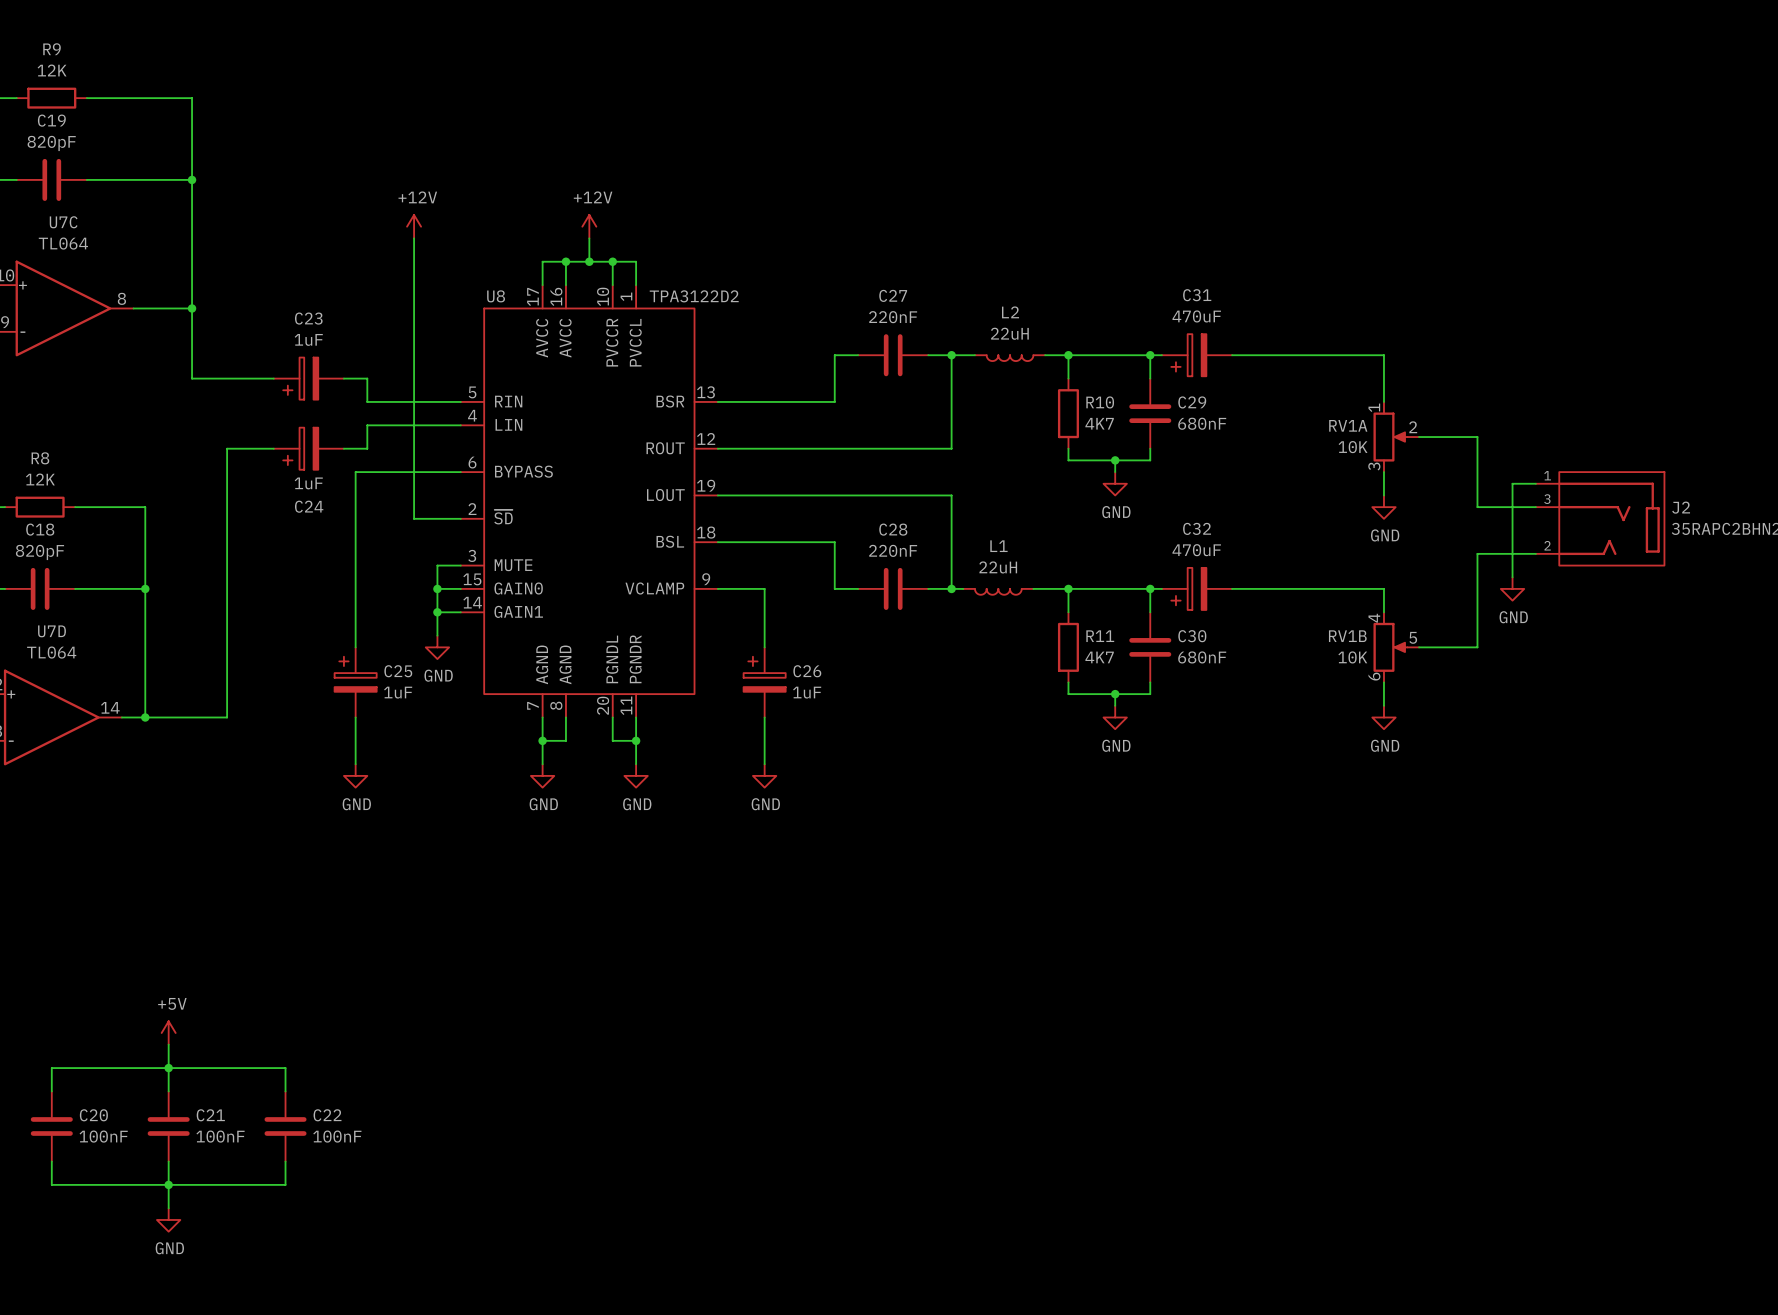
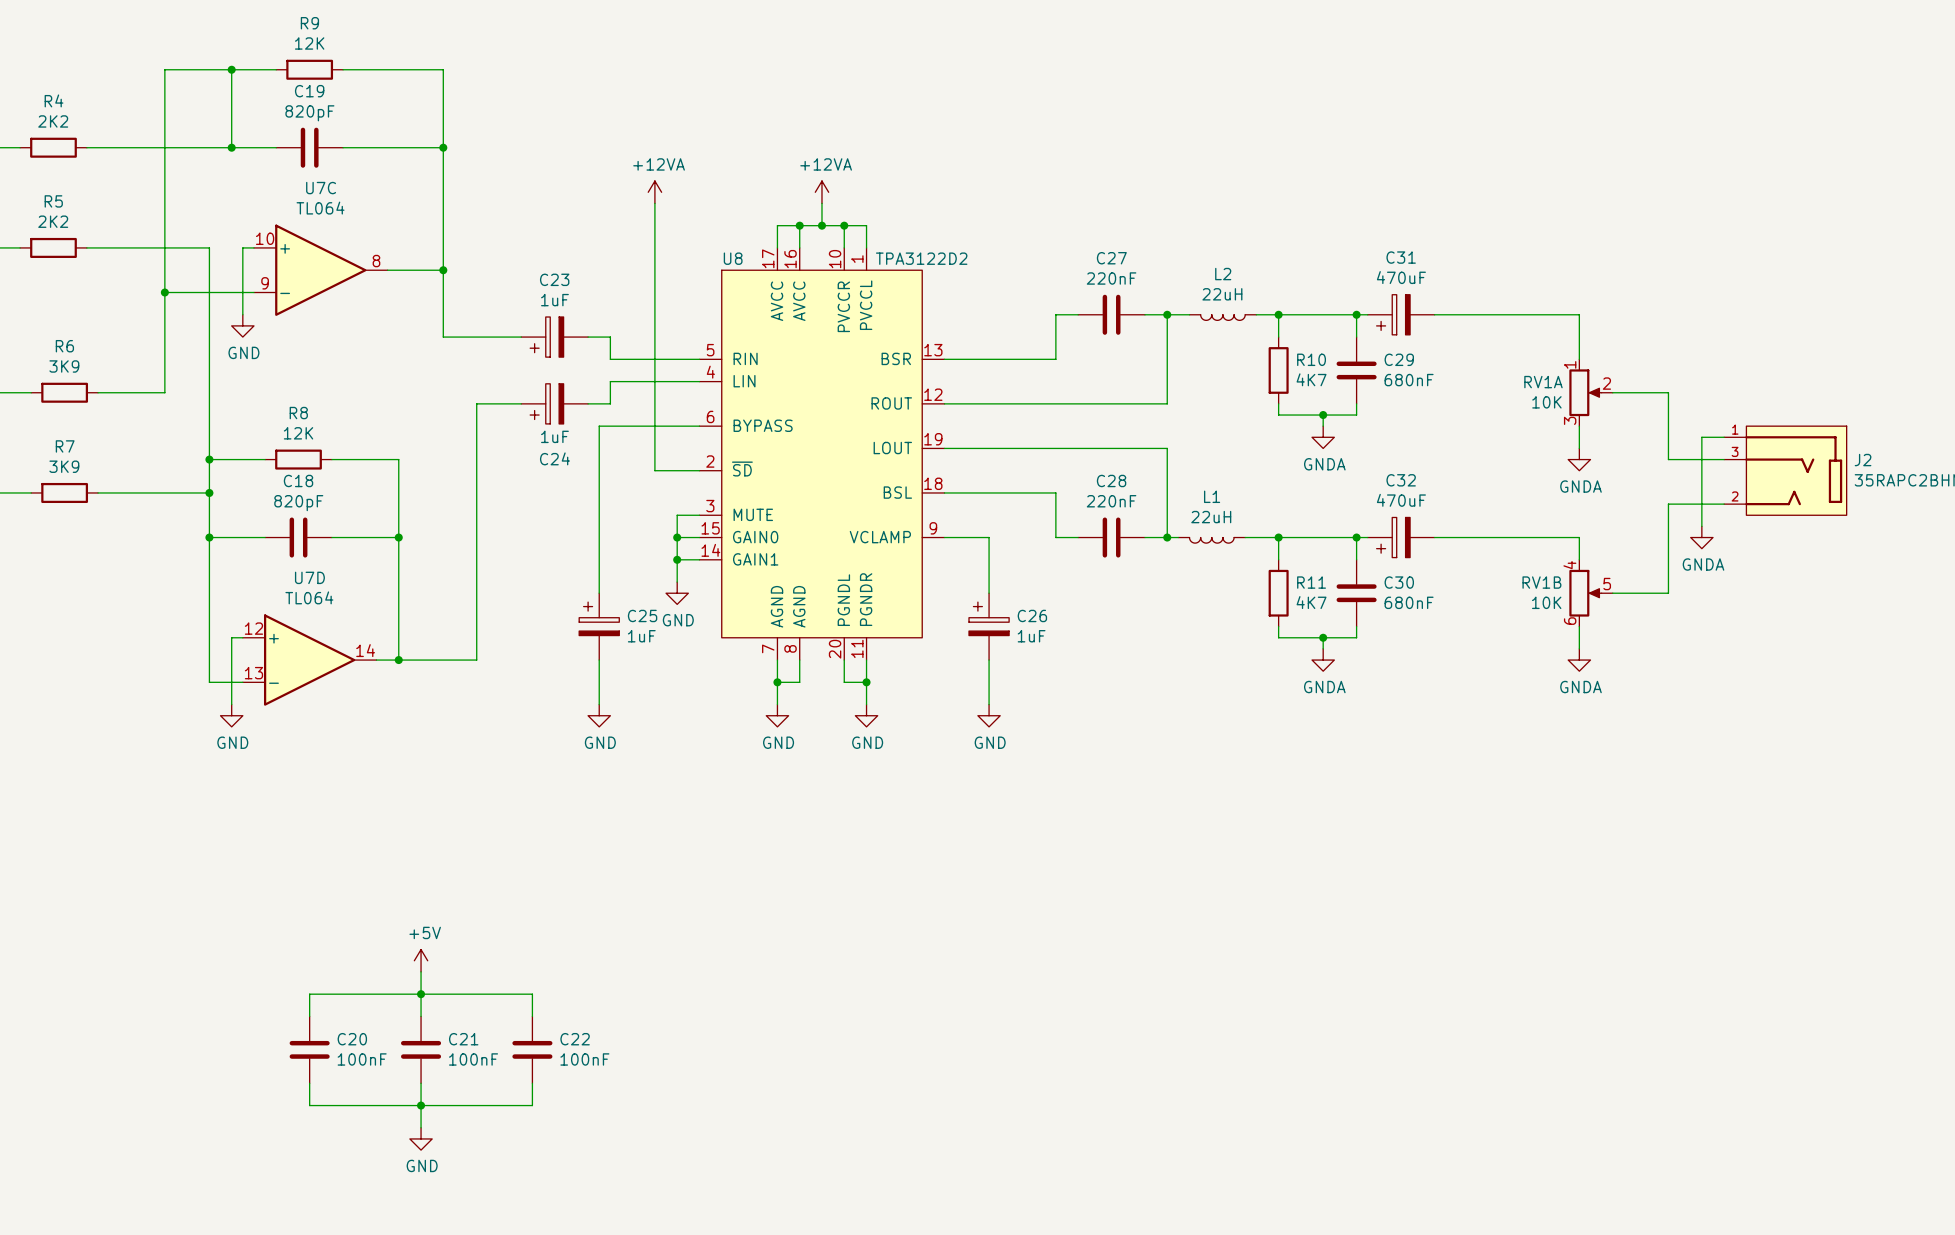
power symbol: +12V (414, 226) -> +12VA (654, 192)
power symbol: +12V (589, 226) -> +12VA (821, 192)
power symbol: GND (1115, 483) -> GNDA (1323, 437)
power symbol: GND (1383, 507) -> GNDA (1579, 459)
power symbol: GND (1512, 588) -> GNDA (1701, 537)
power symbol: GND (1115, 717) -> GNDA (1323, 660)
power symbol: GND (1383, 717) -> GNDA (1579, 660)

